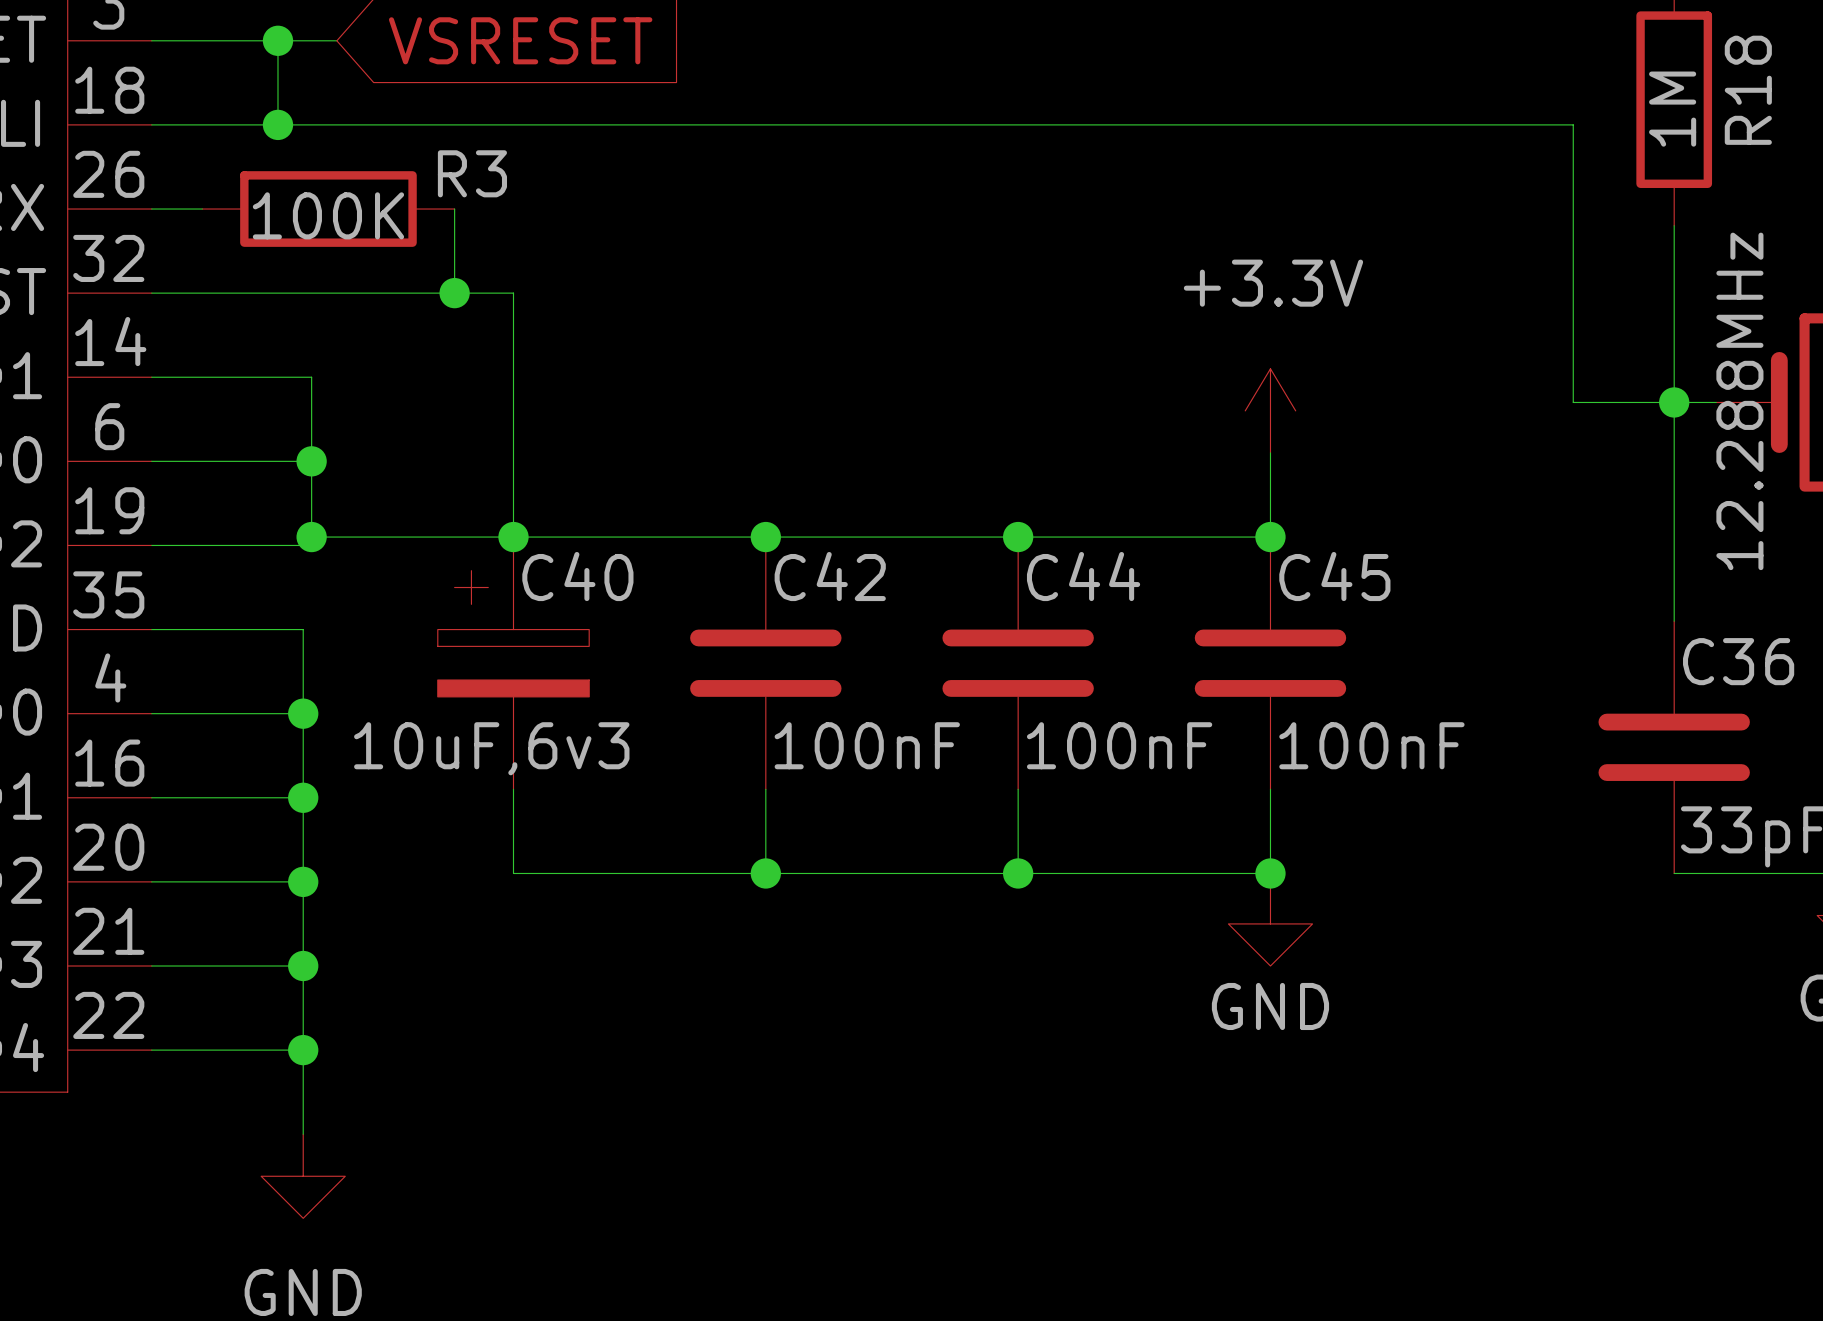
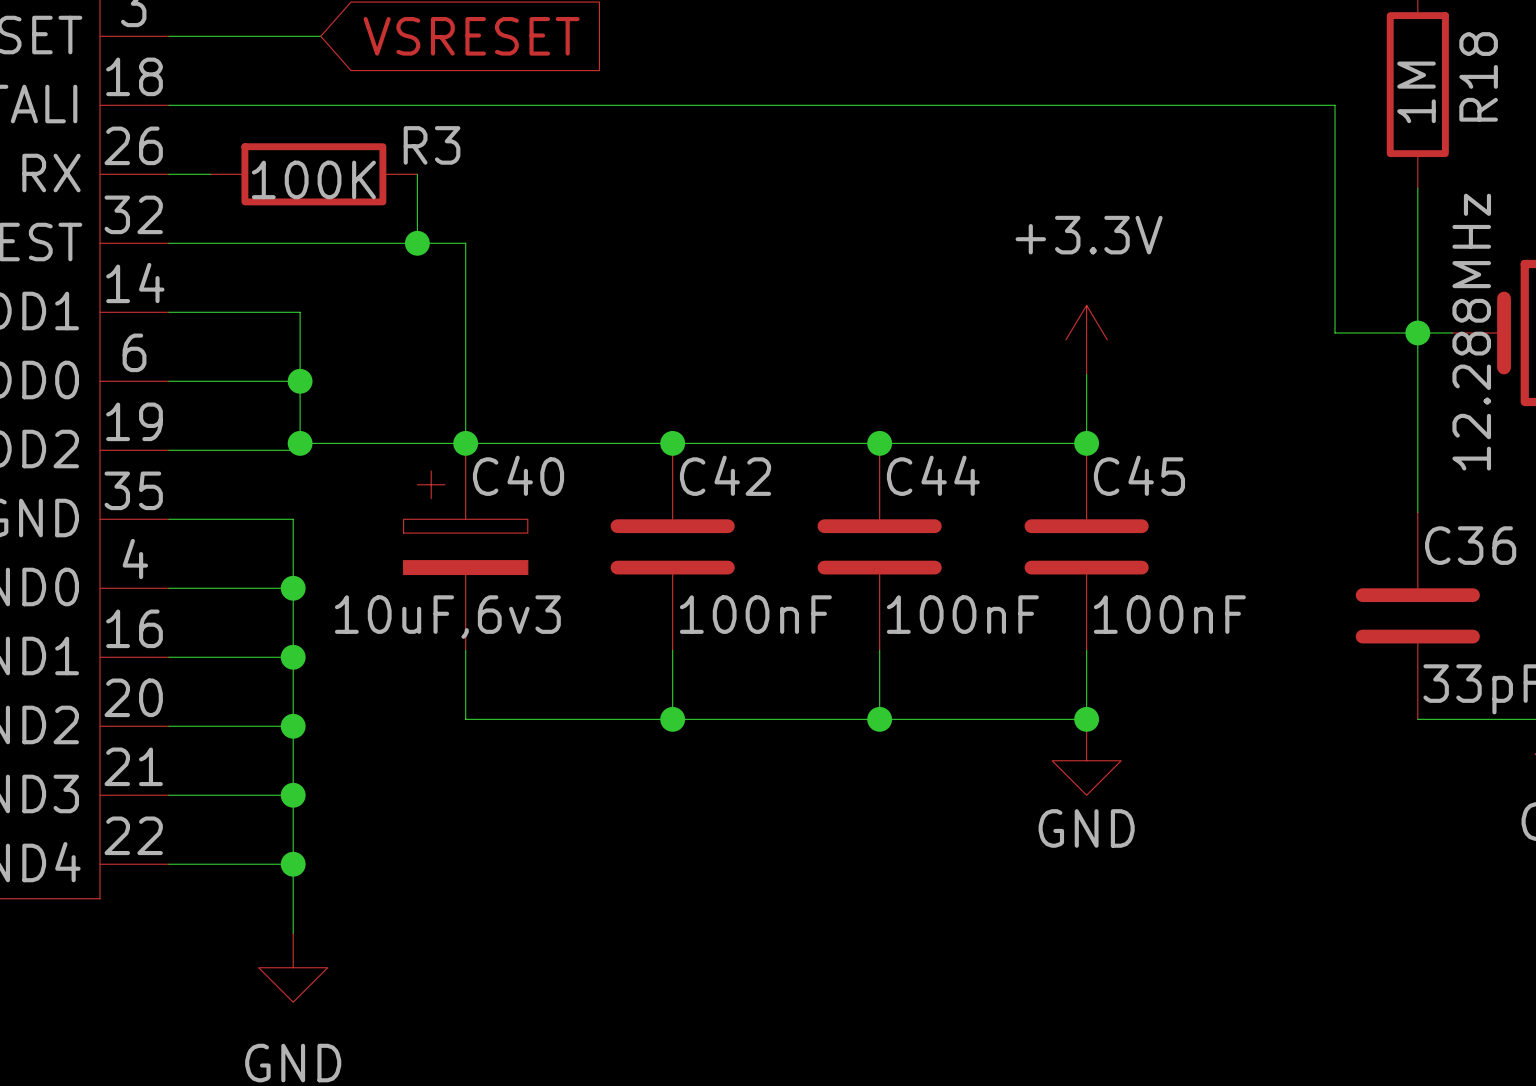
wire: (277, 40) (277, 124) -> none
junction: (277, 40) -> none
junction: (277, 124) -> none

